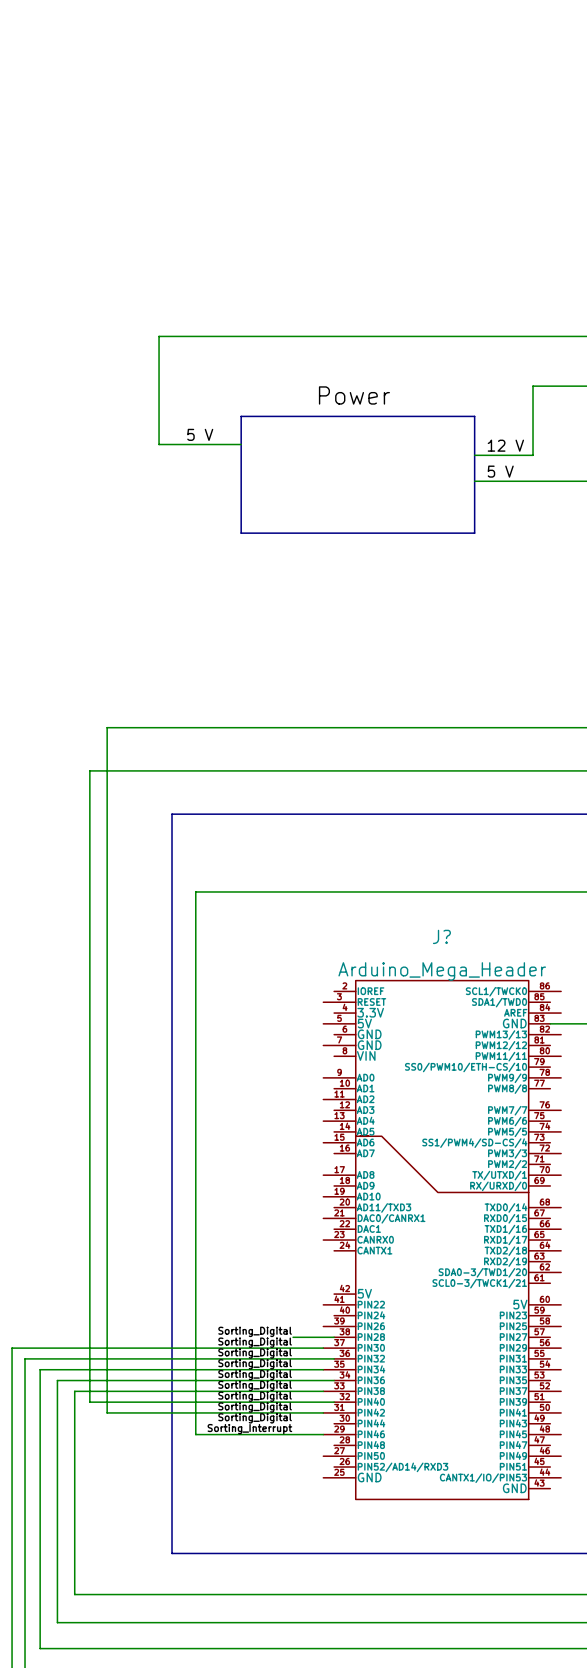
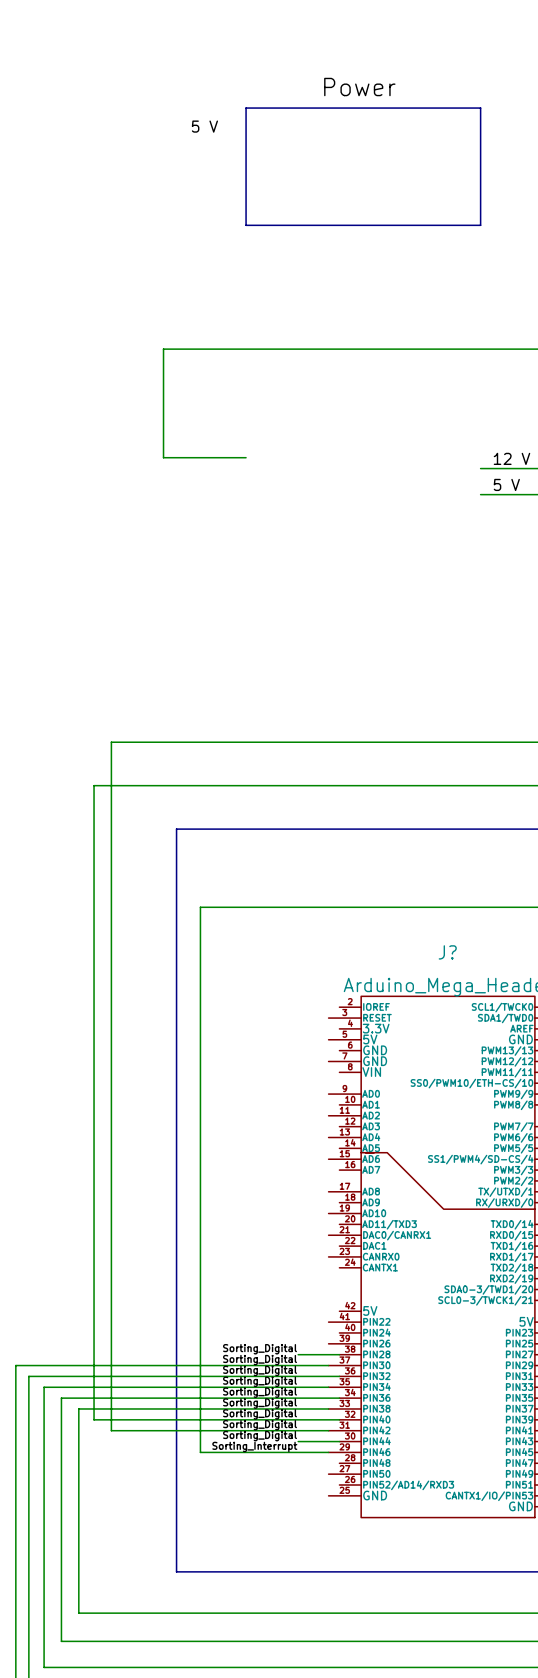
label: none -> Power (359, 87)
line: none -> (246, 108) (246, 225) (480, 225) (480, 108) (246, 108)
label: none -> 5 V (204, 126)
label: Power (354, 395) -> none
line: (241, 416) (241, 533) (474, 533) (474, 416) (241, 416) -> none
label: 5 V (200, 434) -> none
wire: none -> (298, 1441) (339, 1441)

